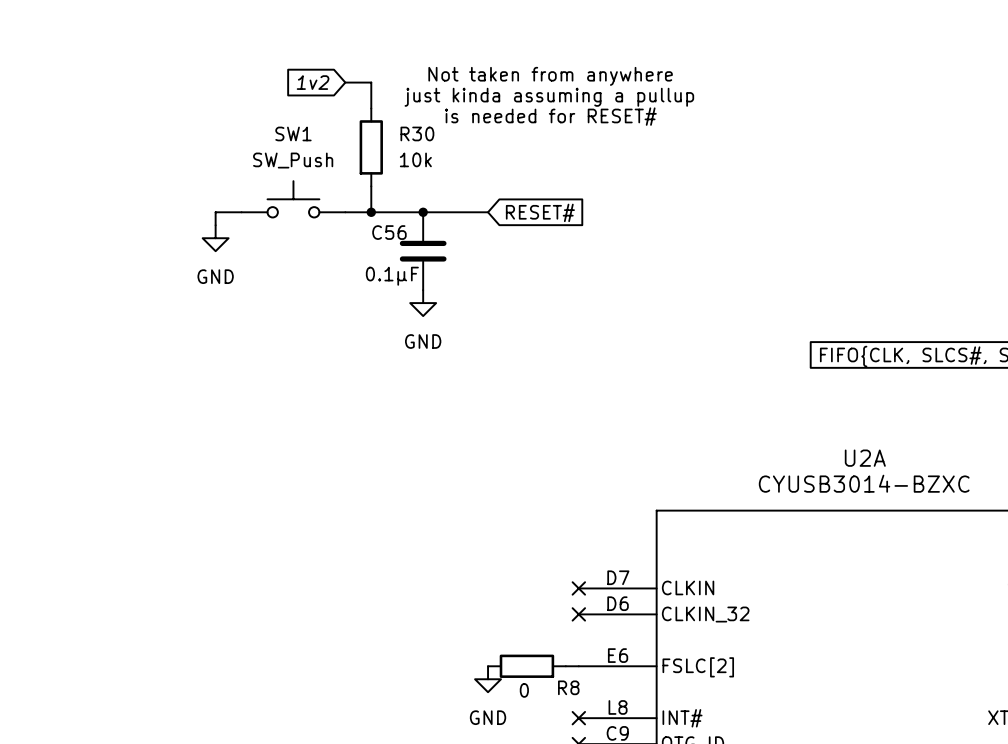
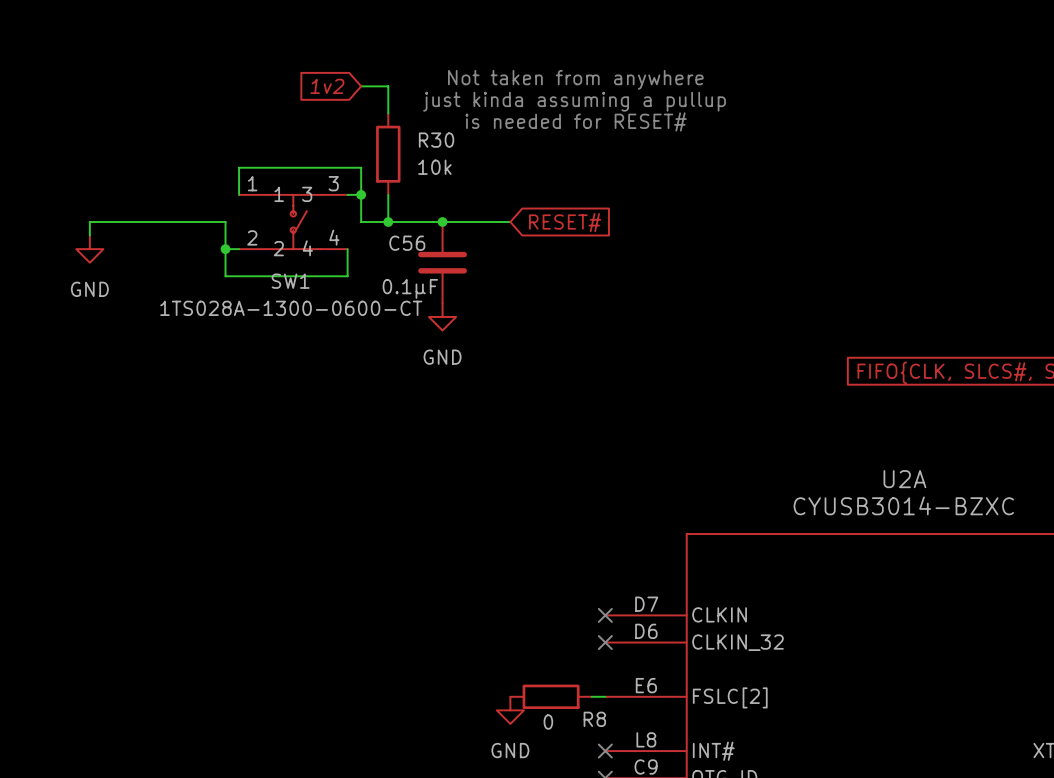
SW1 name position: SW1 (293, 133) -> SW1 (290, 281)
SW1 value: SW_Push (293, 160) -> 1TS028A-1300-0600-CT (291, 308)
SW1 symbol: [241, 181, 346, 218] -> [239, 194, 348, 250]
wire: none -> (239, 194) (239, 167) (361, 167) (361, 222)
wire: none -> (347, 194) (361, 194)
junction: none -> (361, 194)
wire: (215, 212) (241, 212) -> (225, 222) (89, 222) (89, 235)
wire: none -> (225, 235) (225, 276) (347, 276) (347, 249)
power symbol position: GND (215, 238) -> GND (89, 249)
junction: none -> (225, 249)

